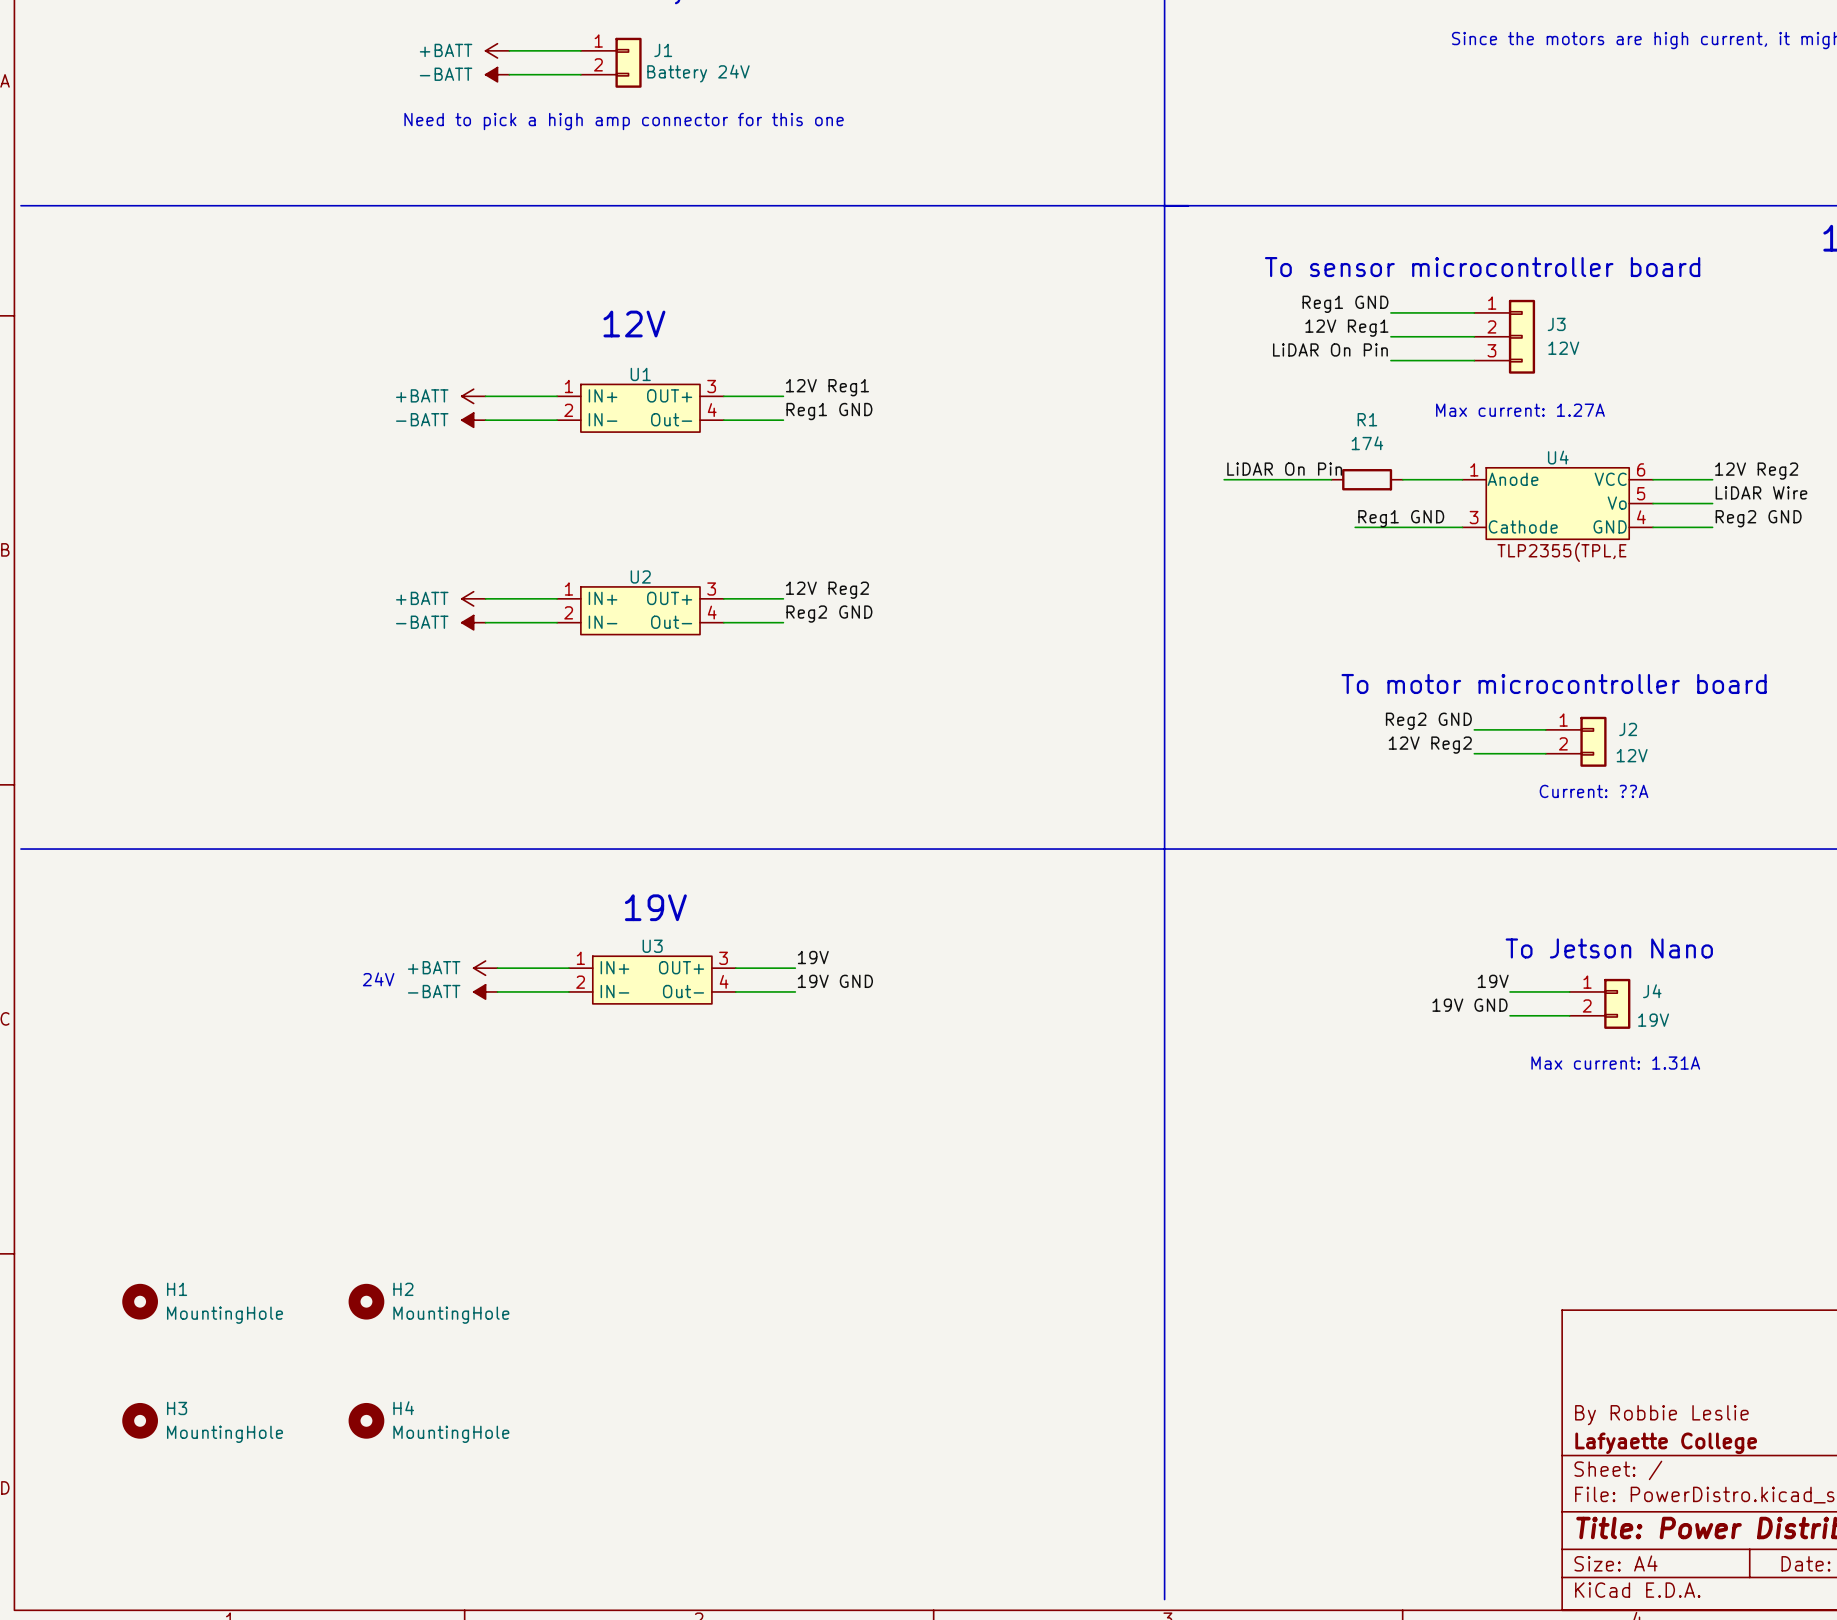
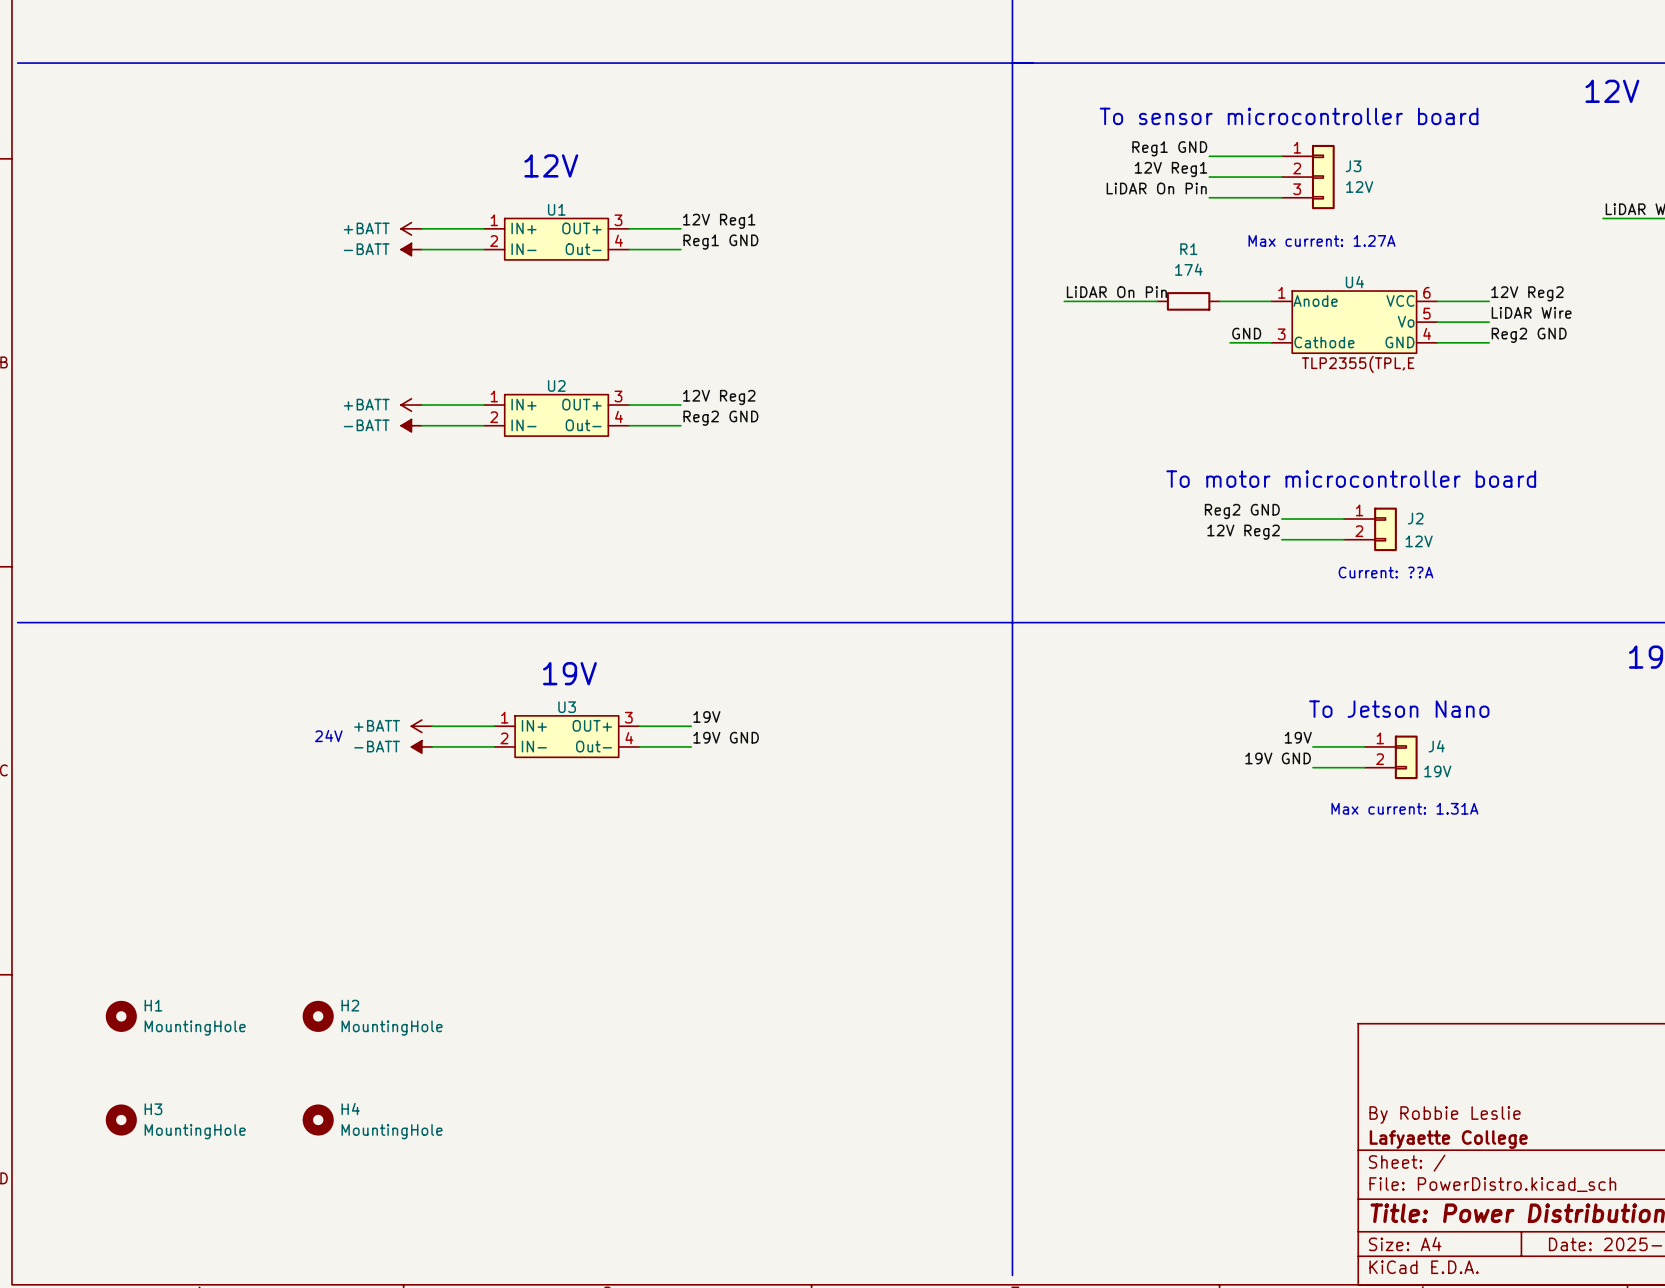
label: none -> GND (1246, 333)
label: Reg1 GND (1401, 518) -> none
wire: (1355, 527) (1414, 527) -> none

